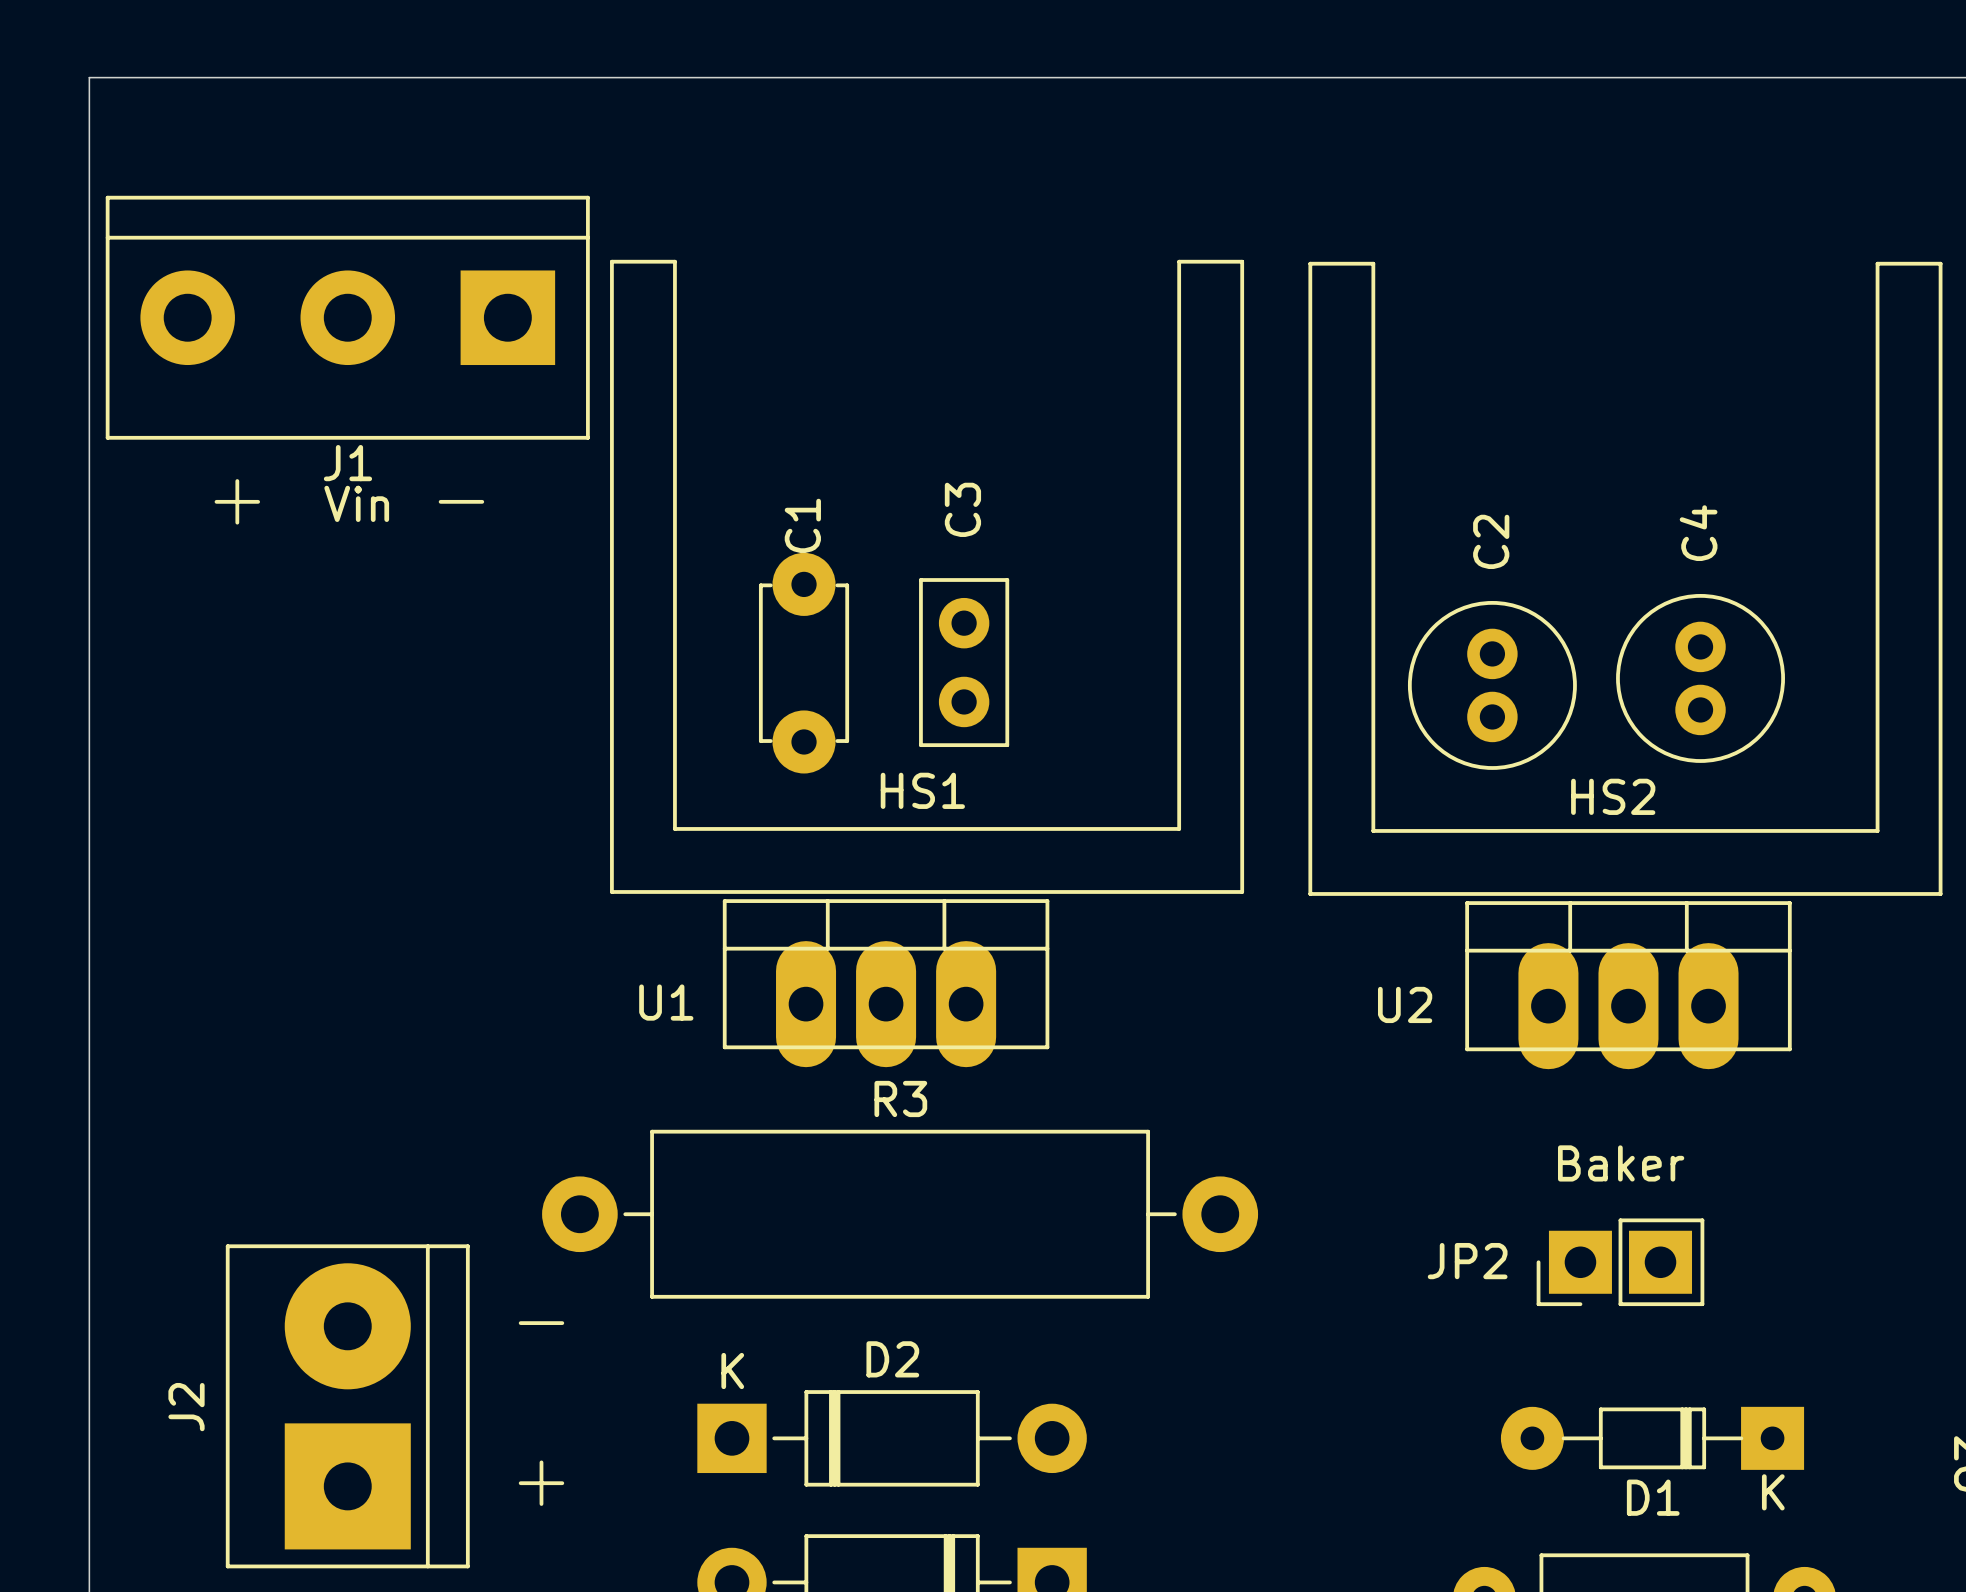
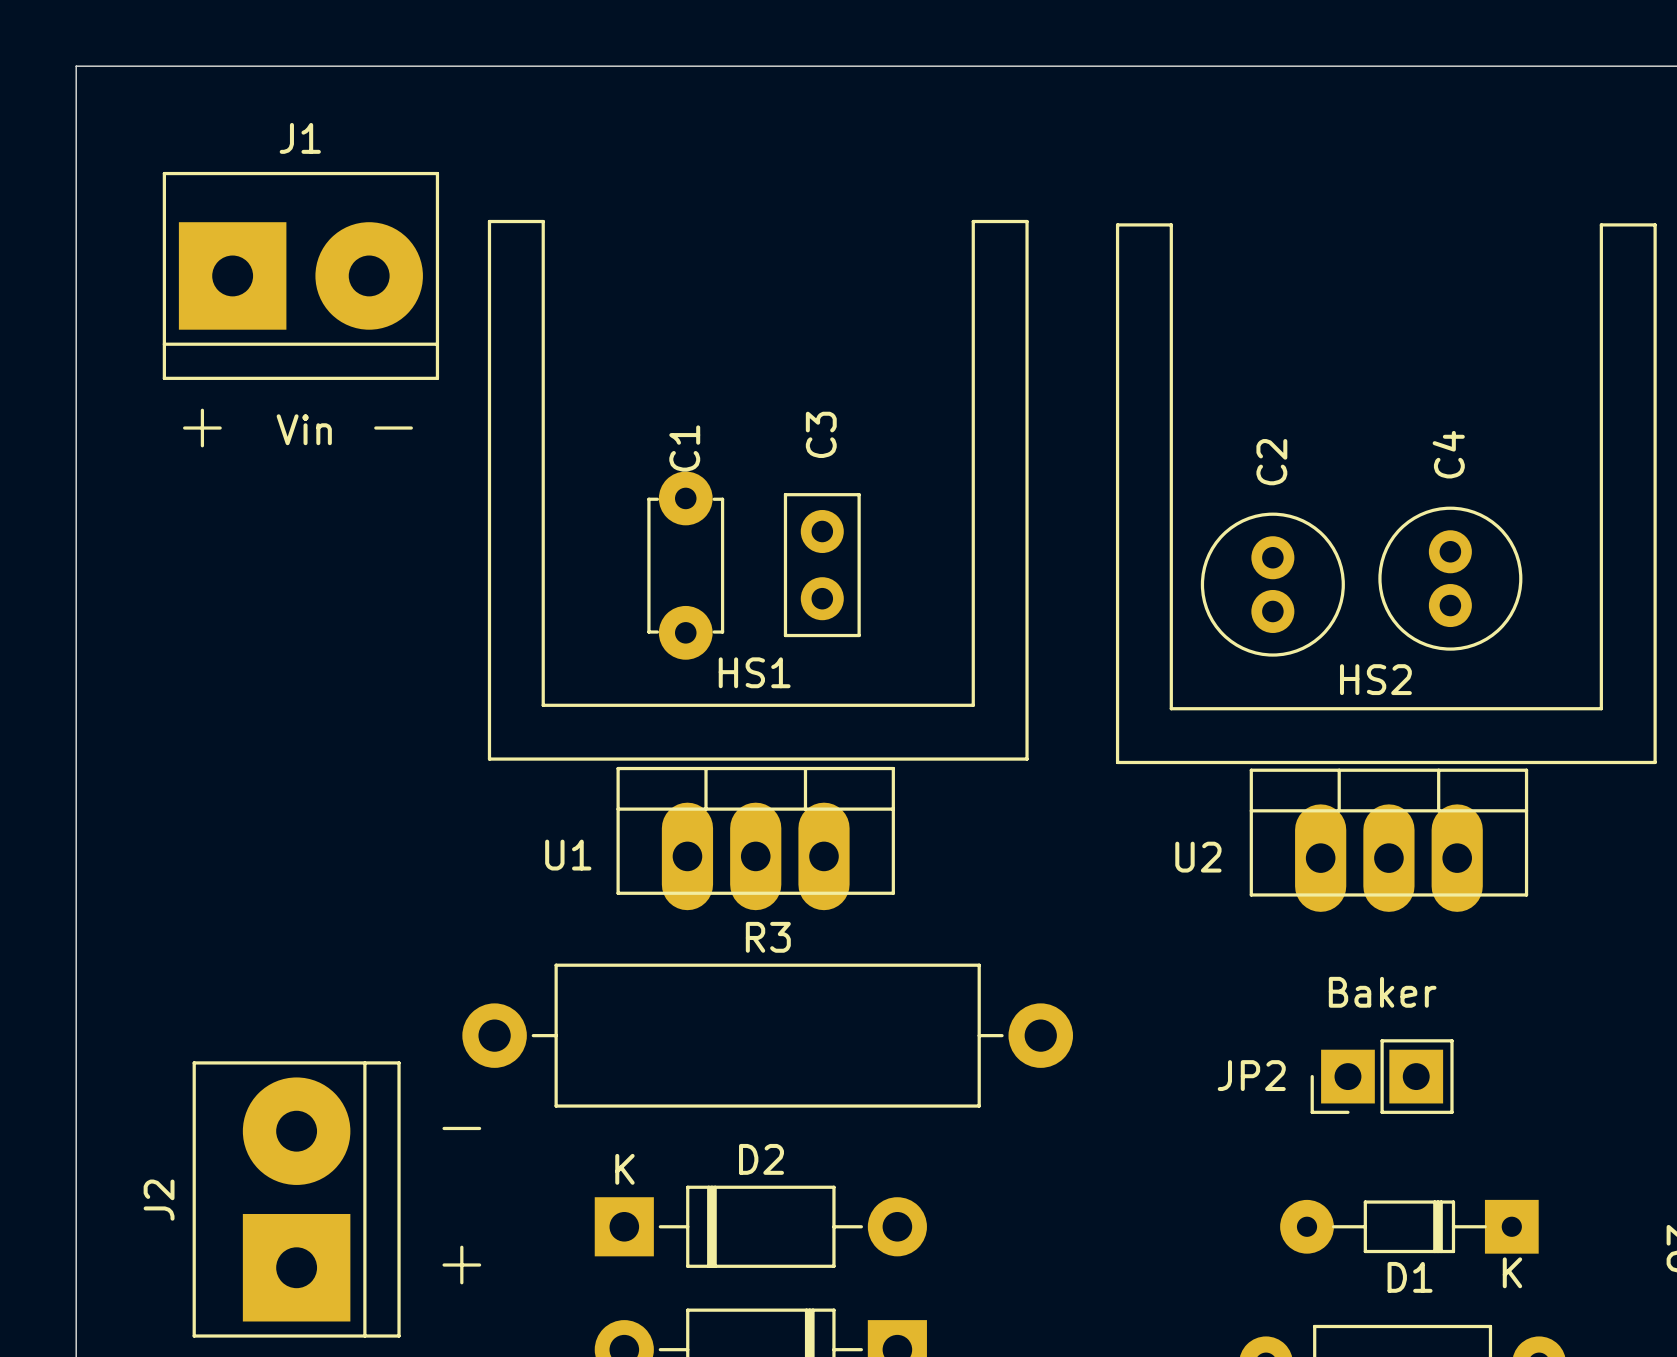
J1 footprint: [105, 195, 590, 440] -> [162, 171, 440, 380]
J1 name position: J1 (347, 463) -> J1 (300, 138)
HS1 position: (927, 576) -> (758, 490)

